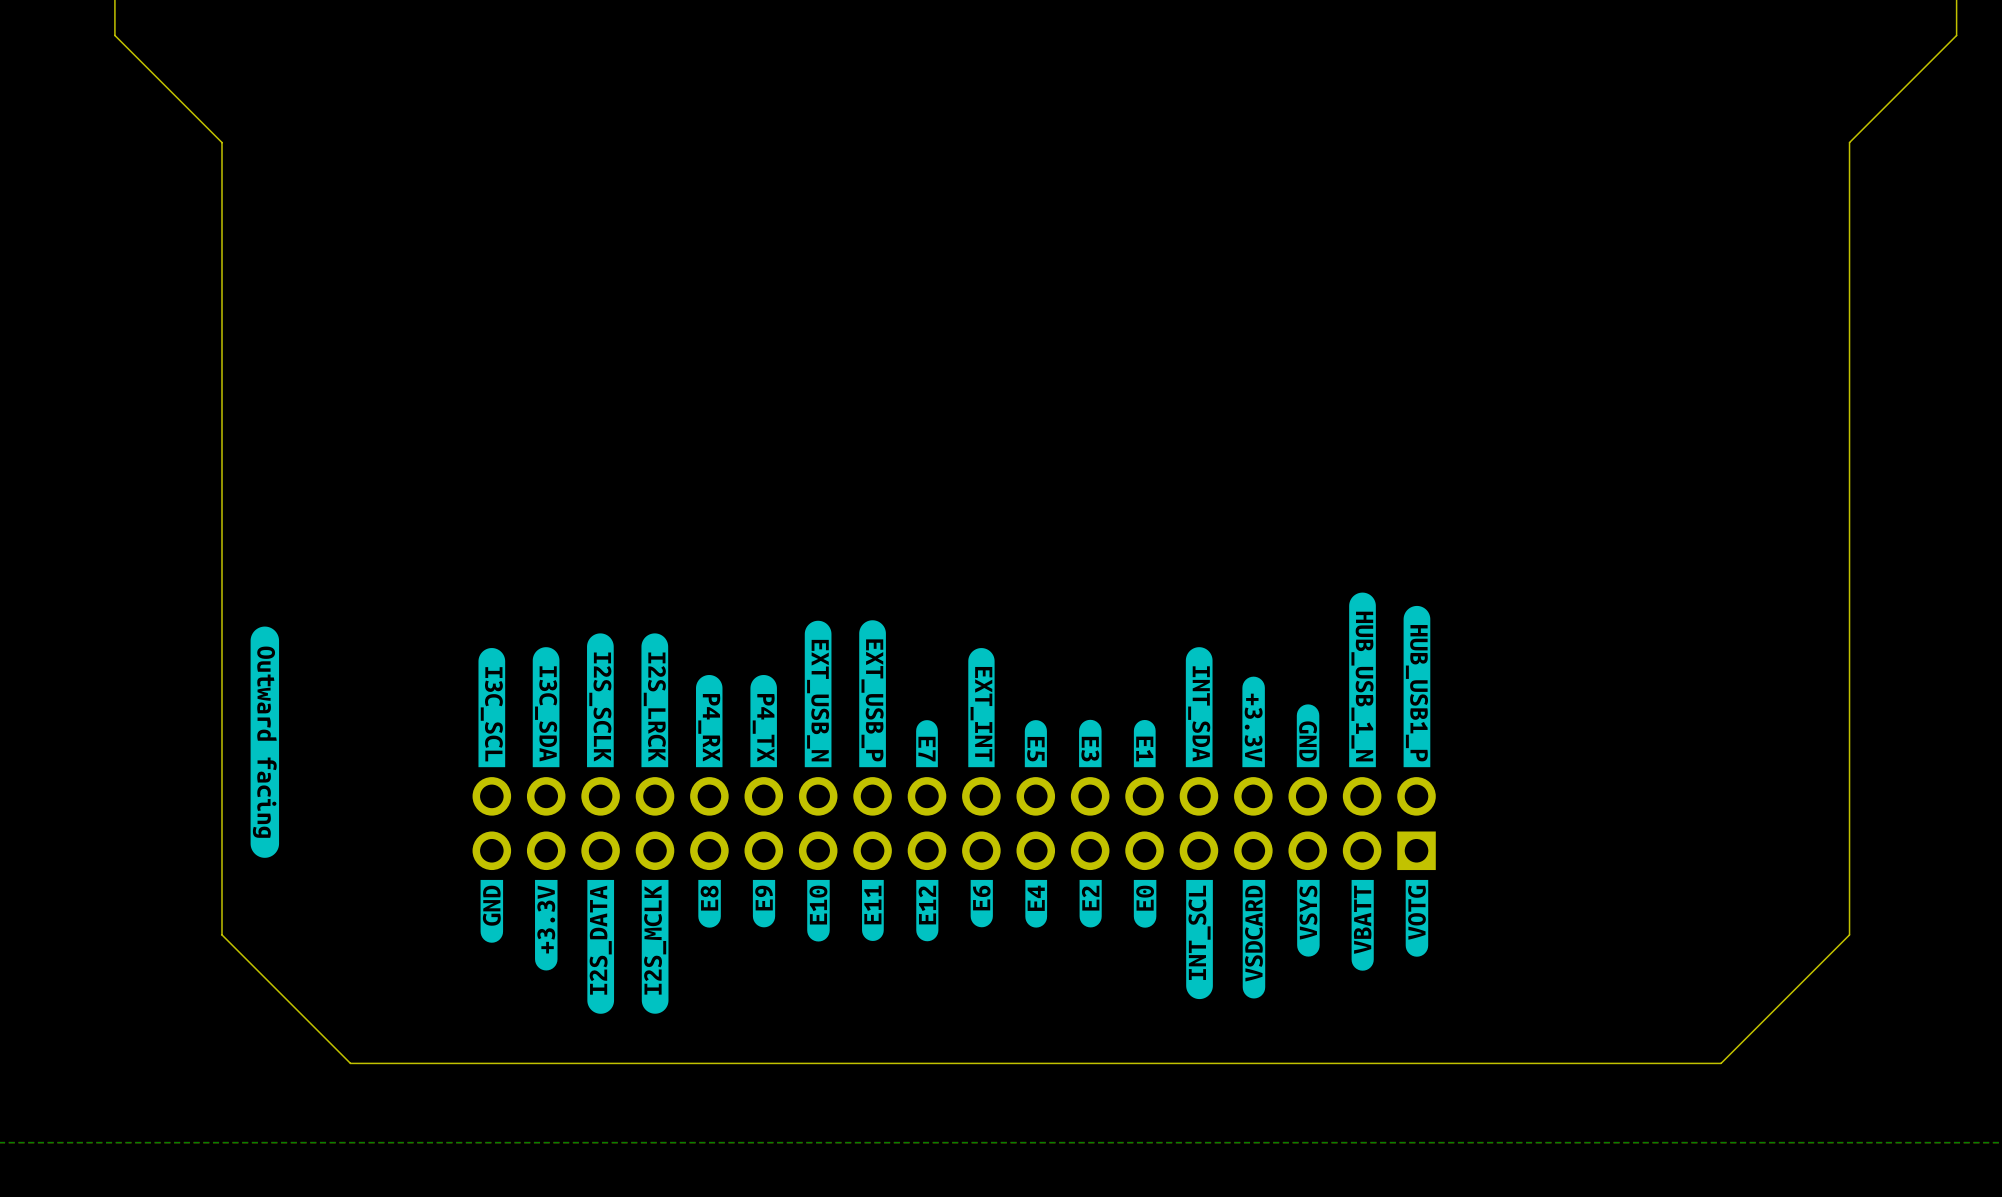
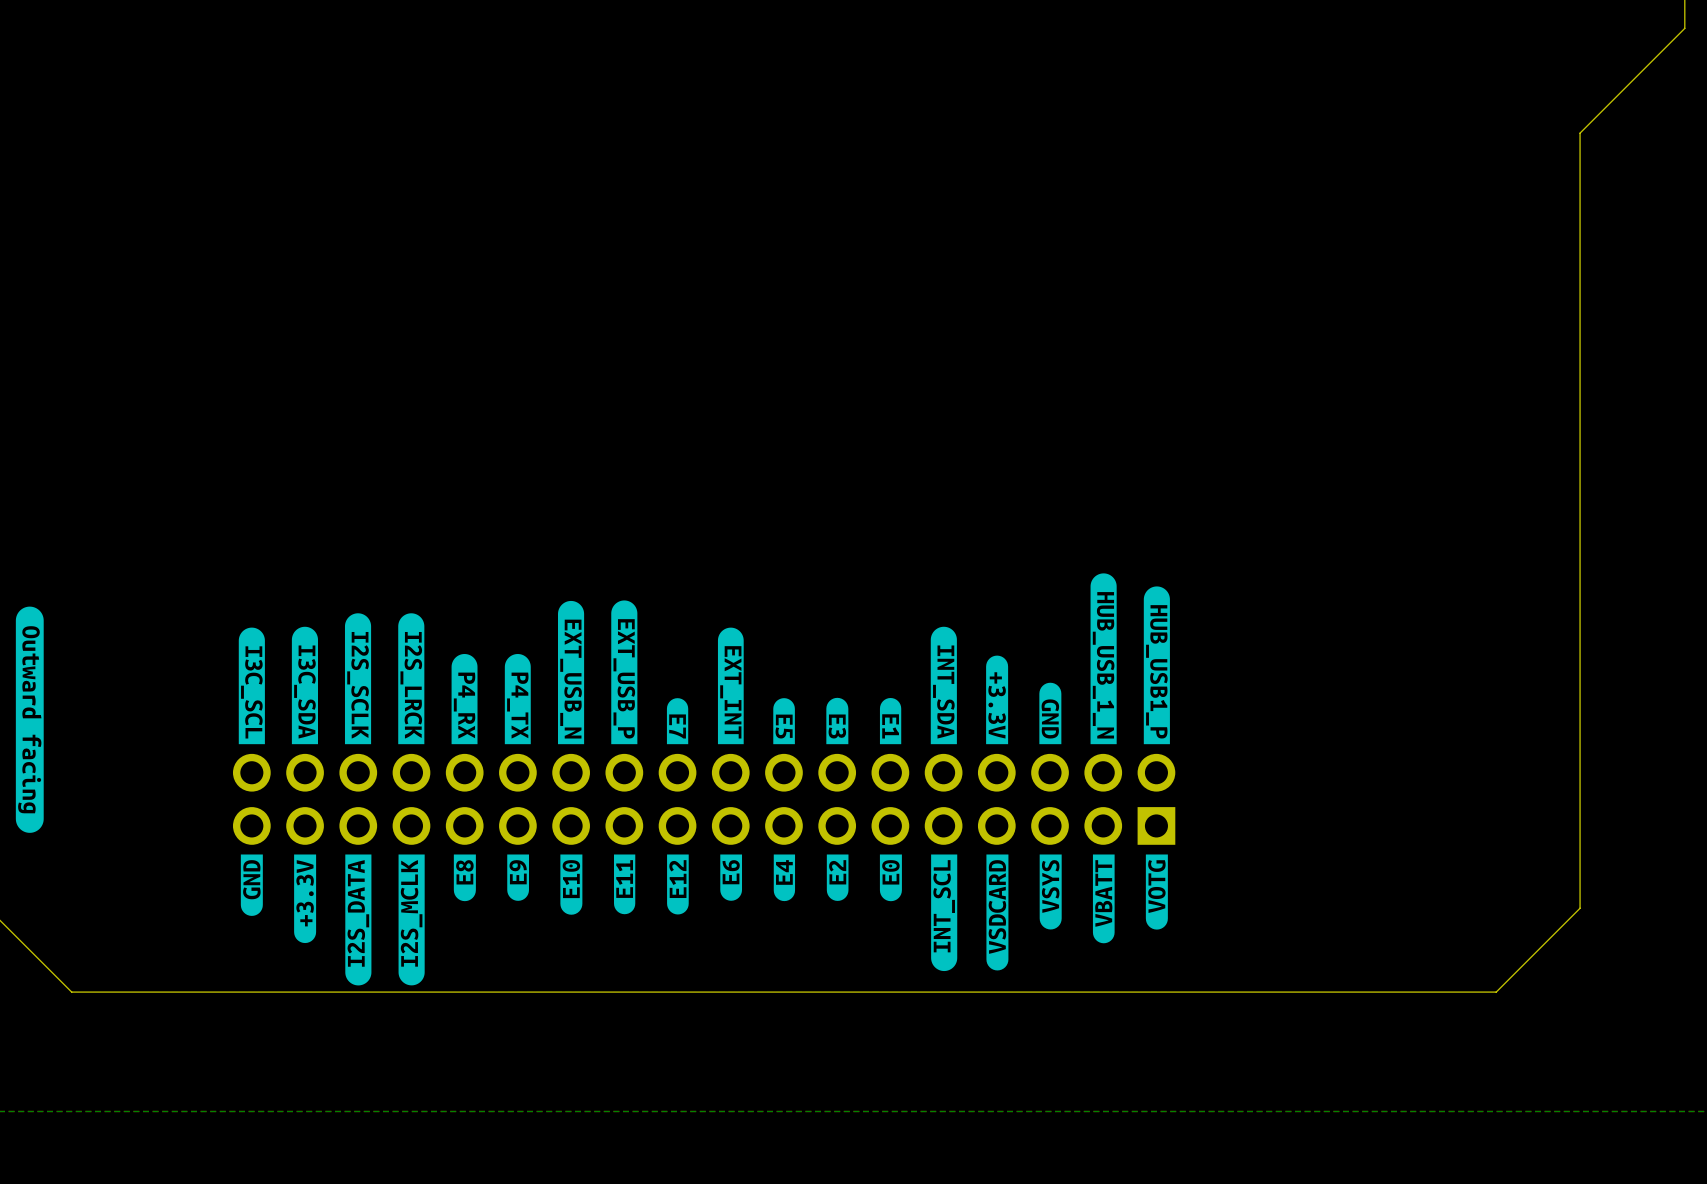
board edge: (1763, 1020) (1721, 1063) (350, 1063) (307, 1020) -> (1496, 992) (71, 992)

